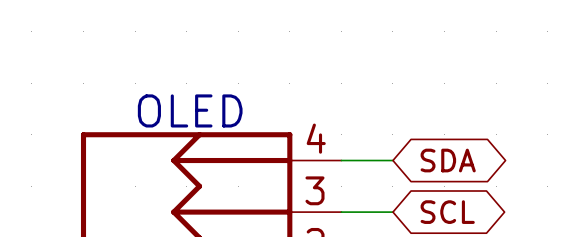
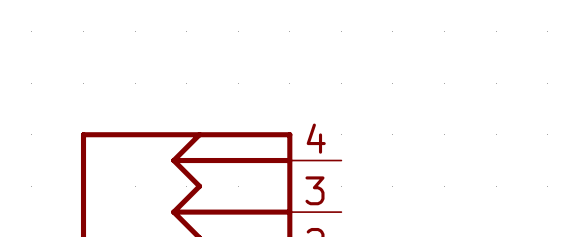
text: OLED (190, 110) -> none
wire: (341, 160) (392, 160) -> none
global label: SDA (448, 160) -> none
wire: (341, 212) (392, 212) -> none
global label: SCL (447, 212) -> none

